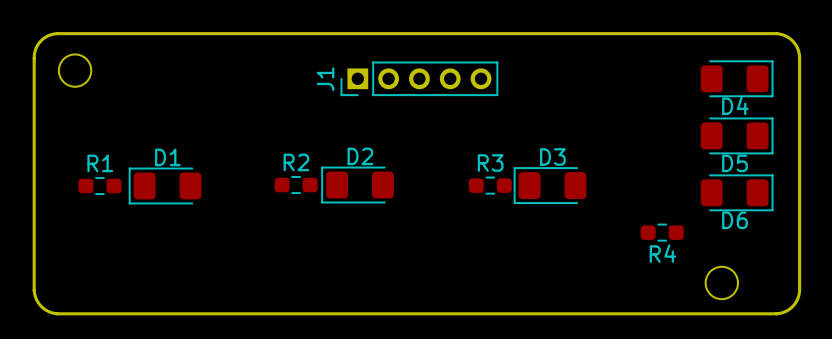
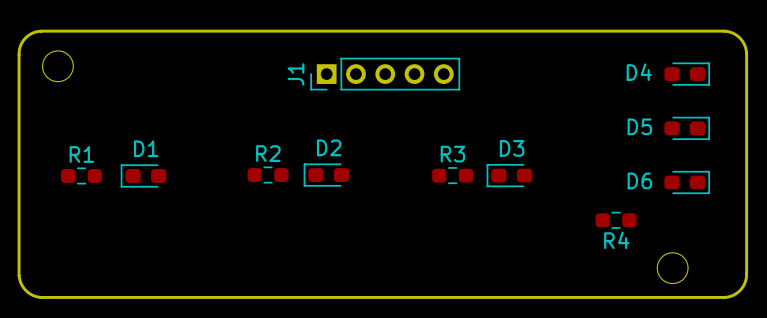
D4 footprint: [700, 60, 774, 98] -> [664, 62, 711, 86]
D4 name position: D4 (735, 105) -> D4 (639, 72)
D5 footprint: [700, 117, 774, 155] -> [664, 116, 711, 141]
D5 name position: D5 (735, 163) -> D5 (639, 126)
D2 footprint: [321, 166, 394, 204] -> [303, 163, 350, 187]
D1 footprint: [128, 167, 202, 205] -> [120, 164, 167, 188]
D3 footprint: [513, 167, 587, 205] -> [486, 163, 533, 188]
D6 footprint: [700, 174, 774, 212] -> [664, 170, 711, 195]
D6 name position: D6 (735, 220) -> D6 (639, 180)

